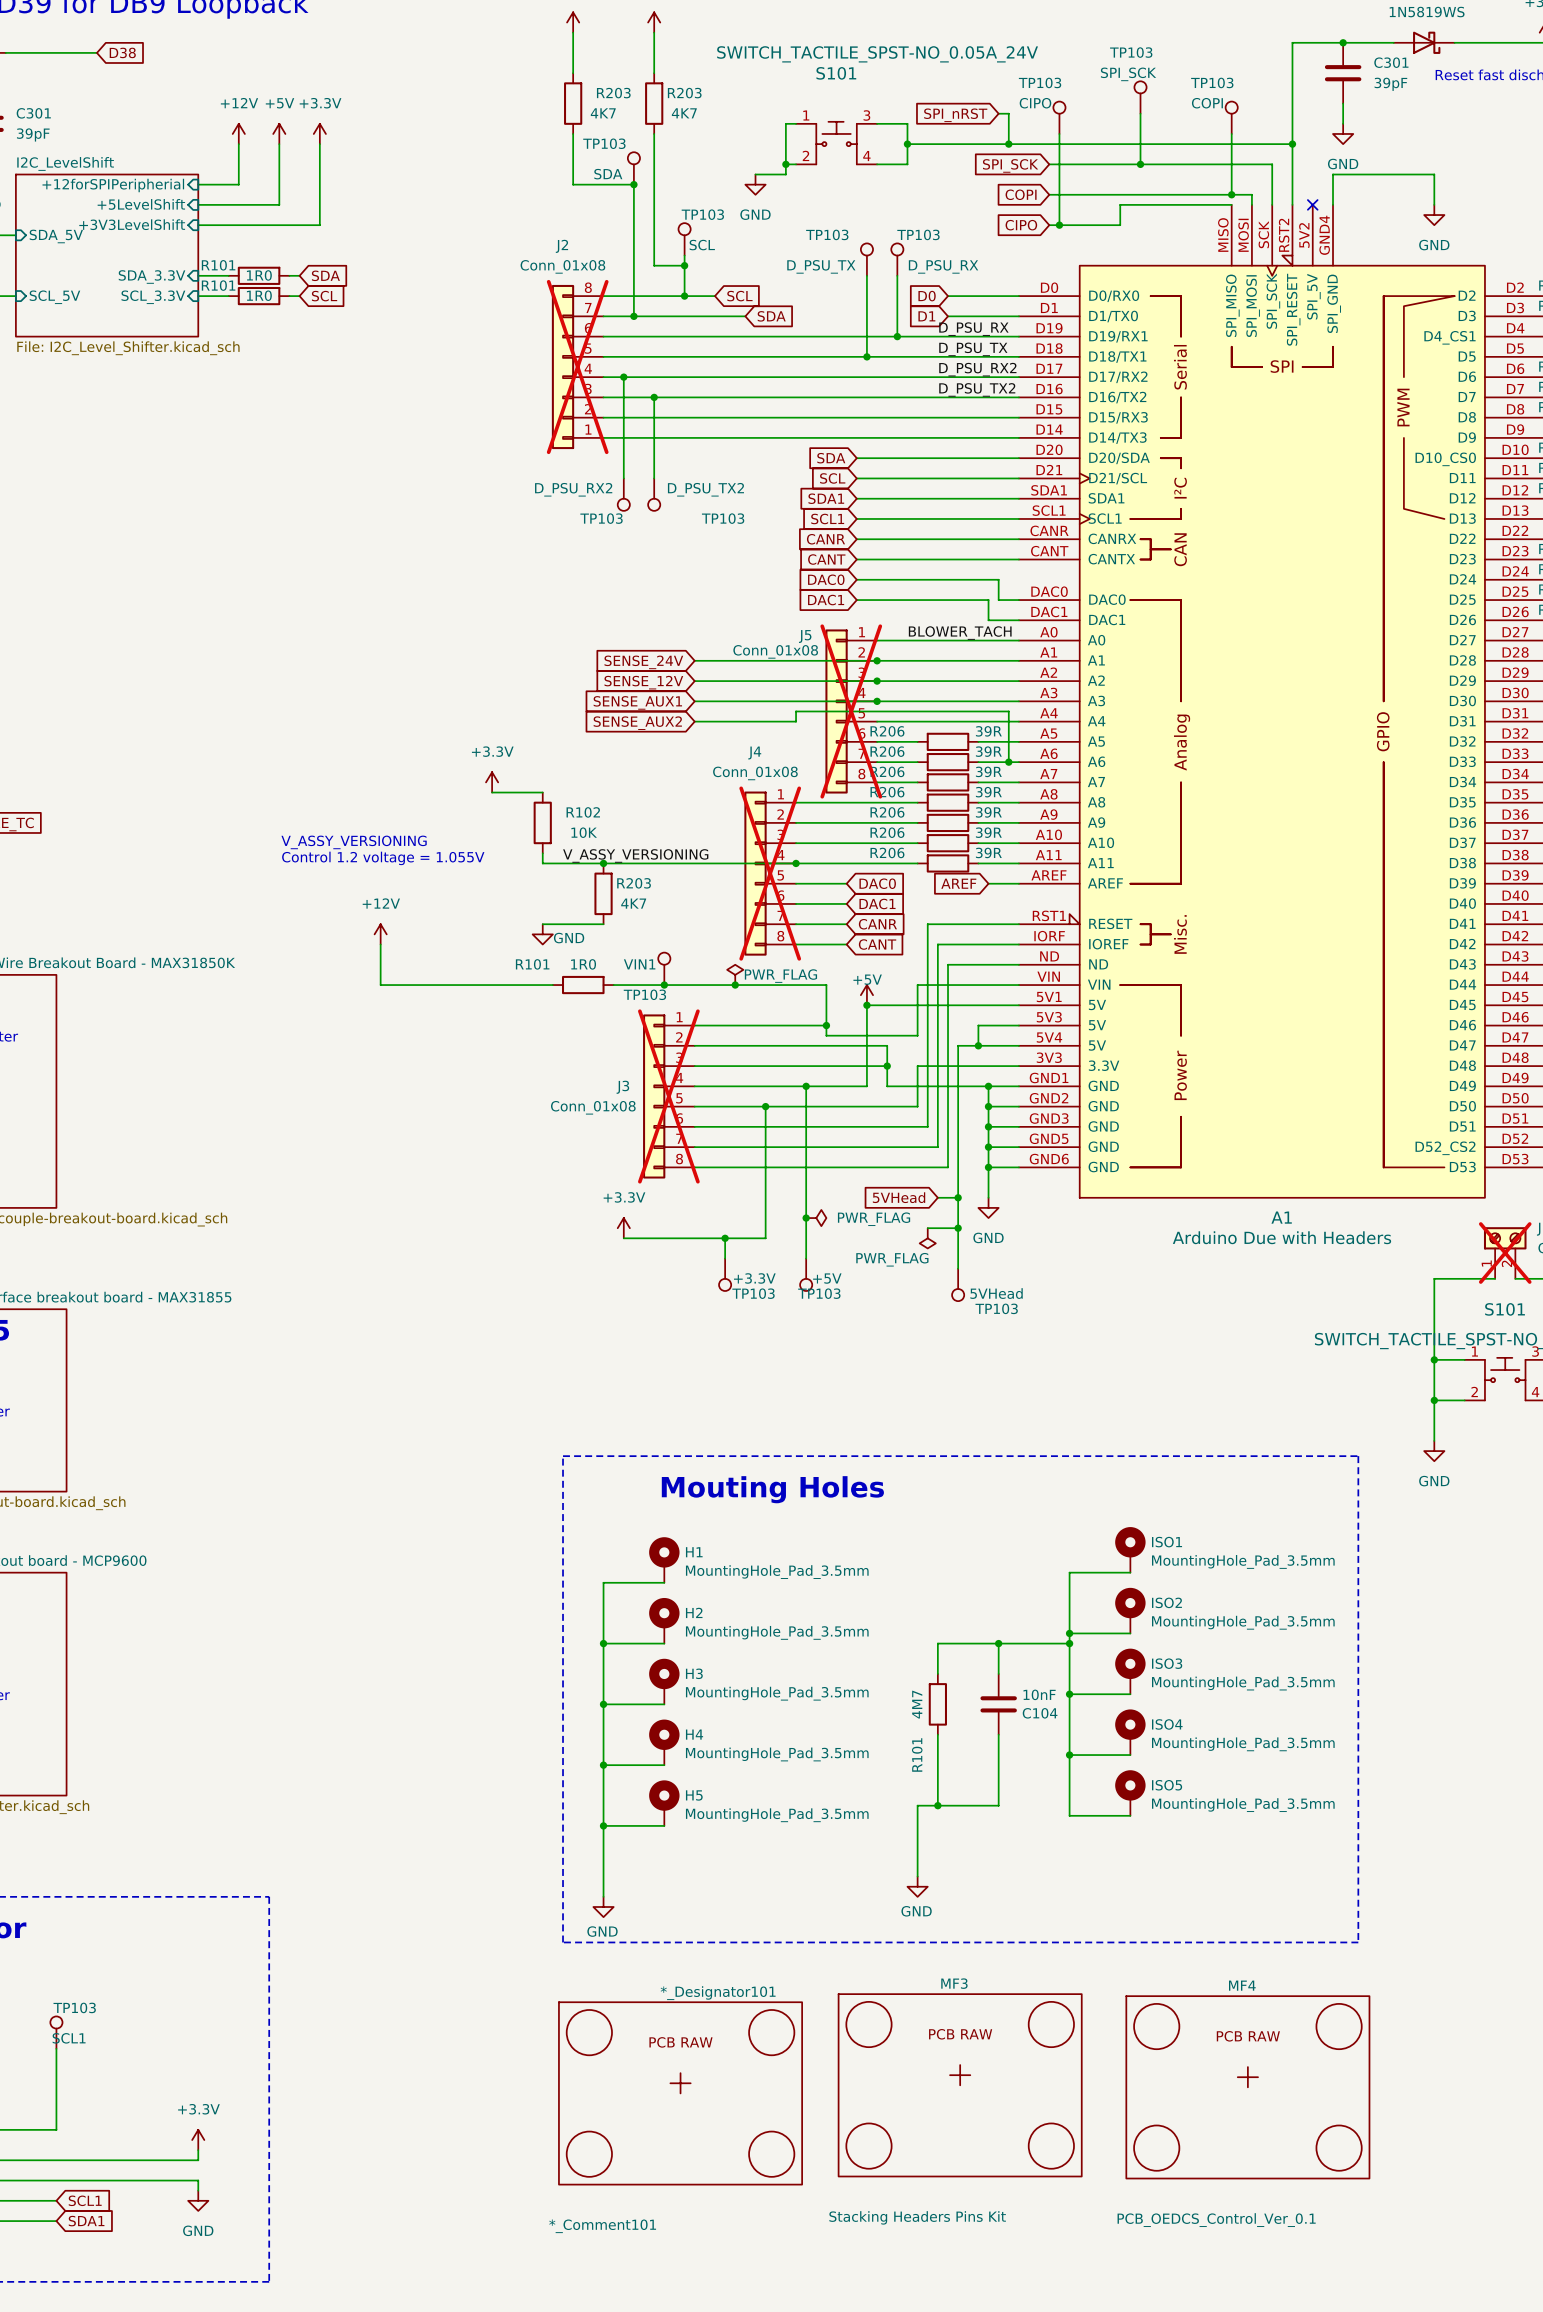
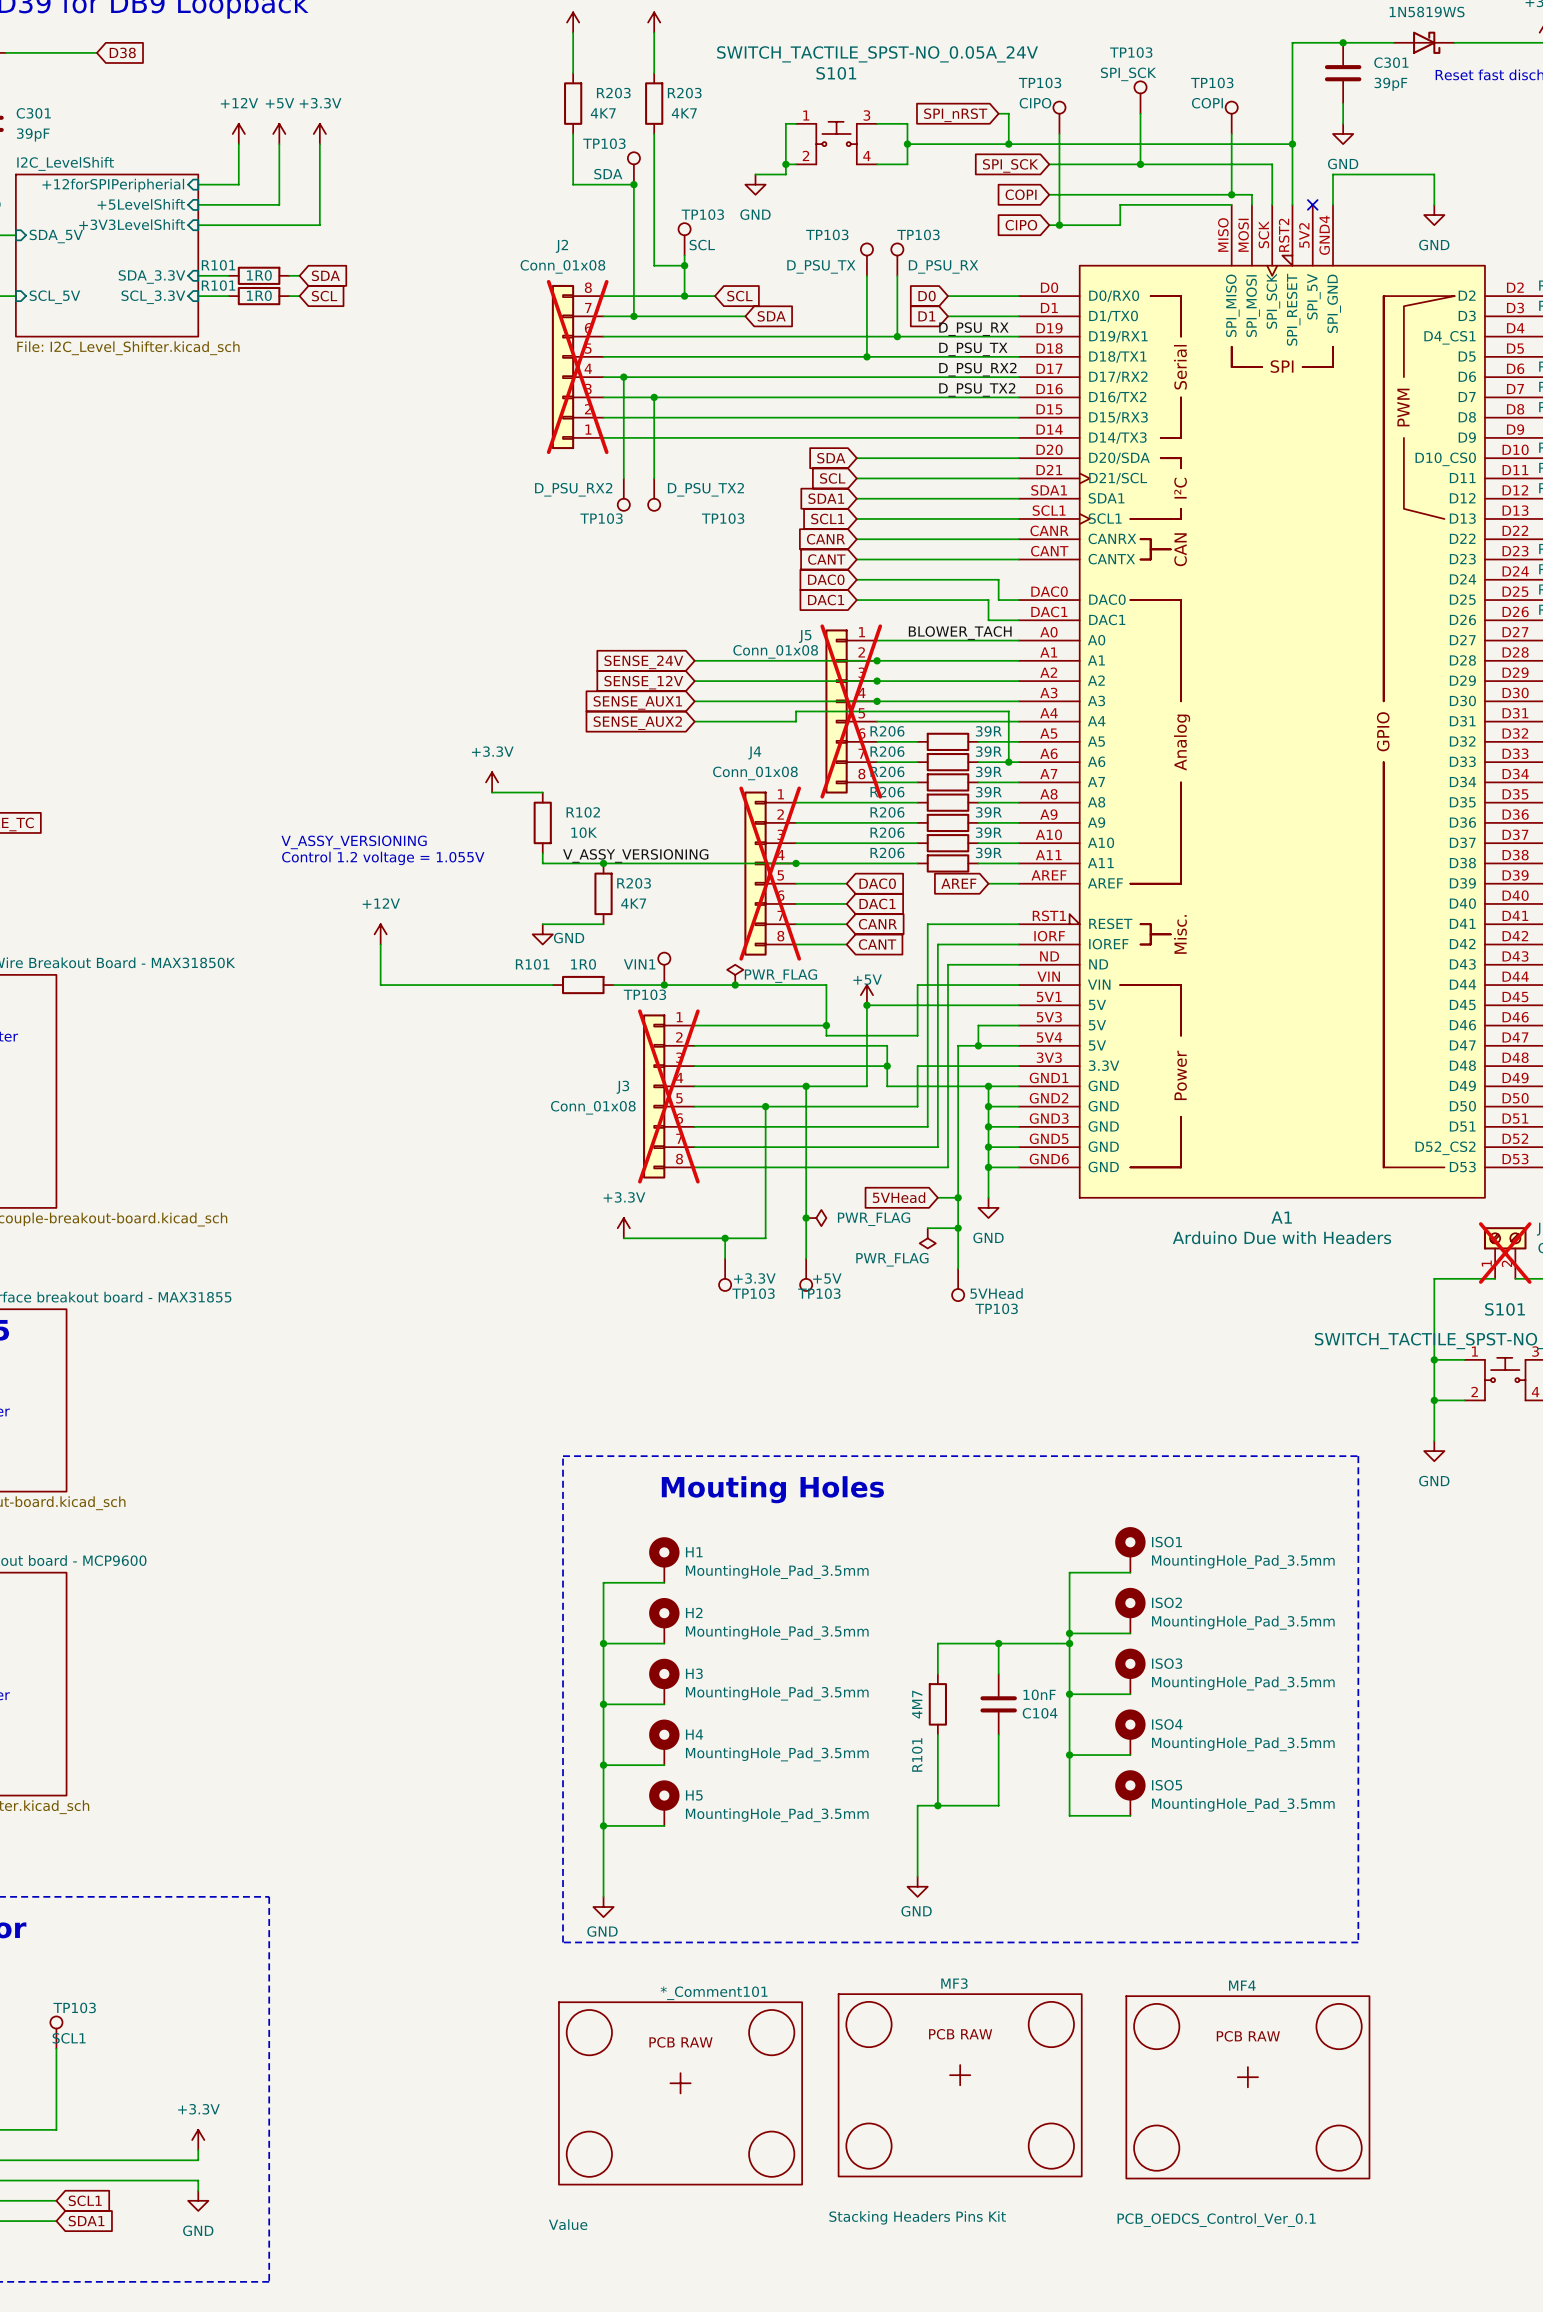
*_Designator101 name: *_Designator101 (718, 1993) -> *_Comment101 (714, 1993)
*_Designator101 value: *_Comment101 (602, 2226) -> Value (568, 2224)

